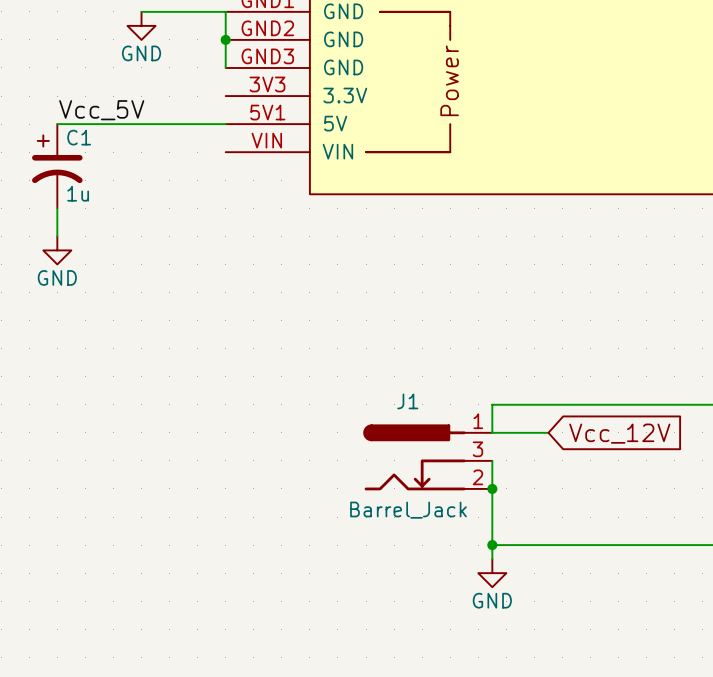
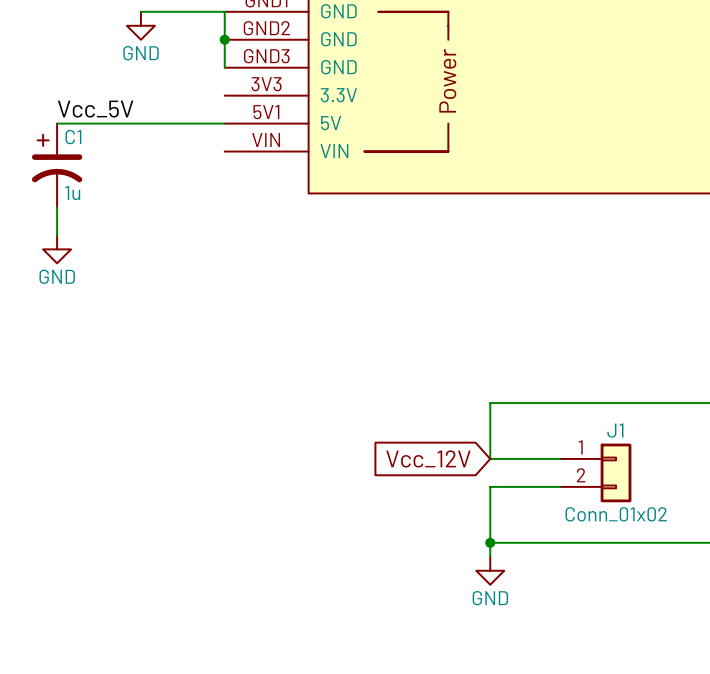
J1 name position: J1 (407, 401) -> J1 (615, 430)
J1 symbol: [363, 424, 493, 491] -> [560, 443, 632, 503]
wire: (492, 432) (548, 432) -> (490, 431) (490, 458) (560, 458)
global label rotation: 0° (619, 433) -> 180° (428, 458)
global label position: Vcc_12V (619, 433) -> Vcc_12V (428, 458)
wire: (492, 460) (492, 488) -> (560, 486) (490, 486)
junction: (492, 488) -> none
J1 value: Barrel_Jack (408, 510) -> Conn_01x02 (616, 514)

